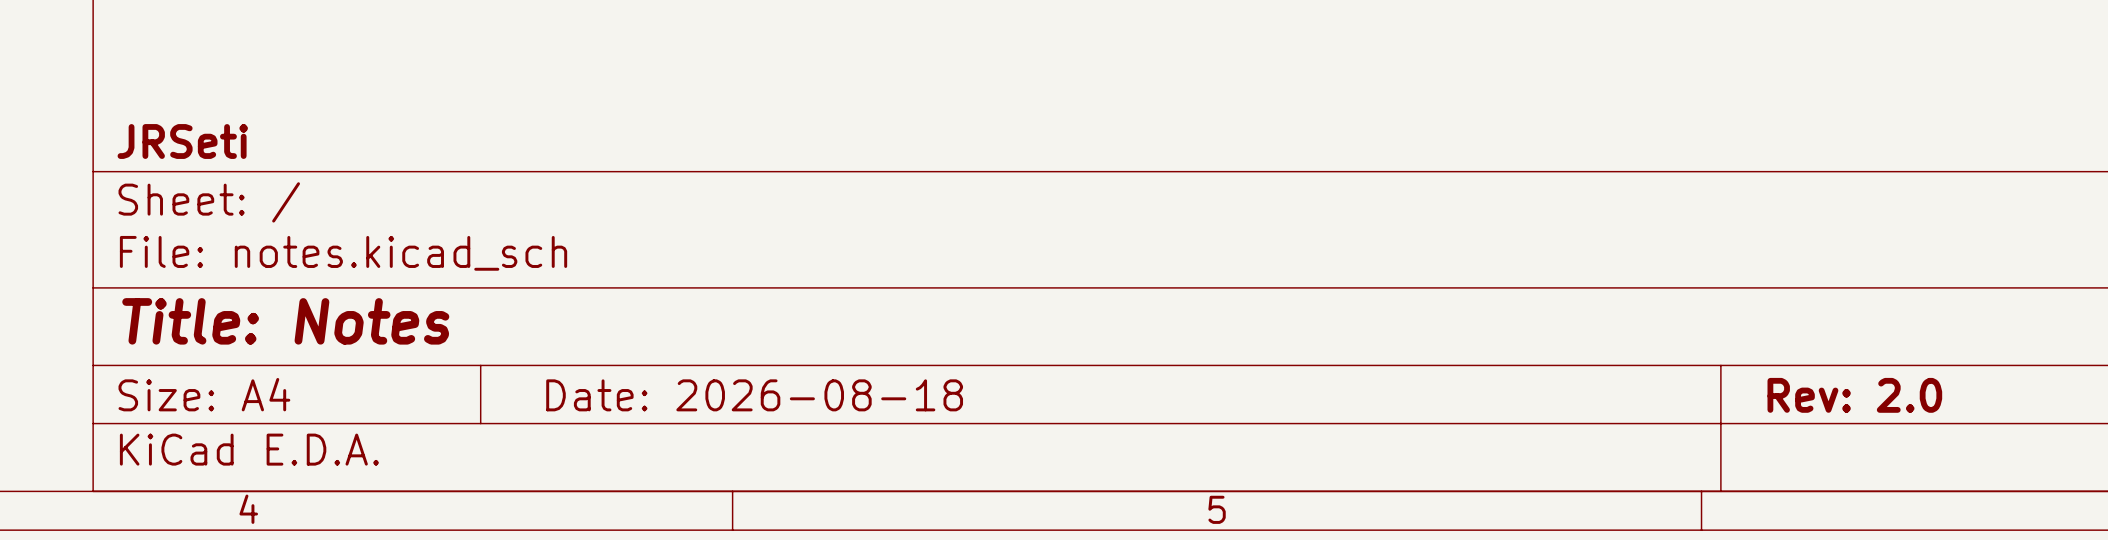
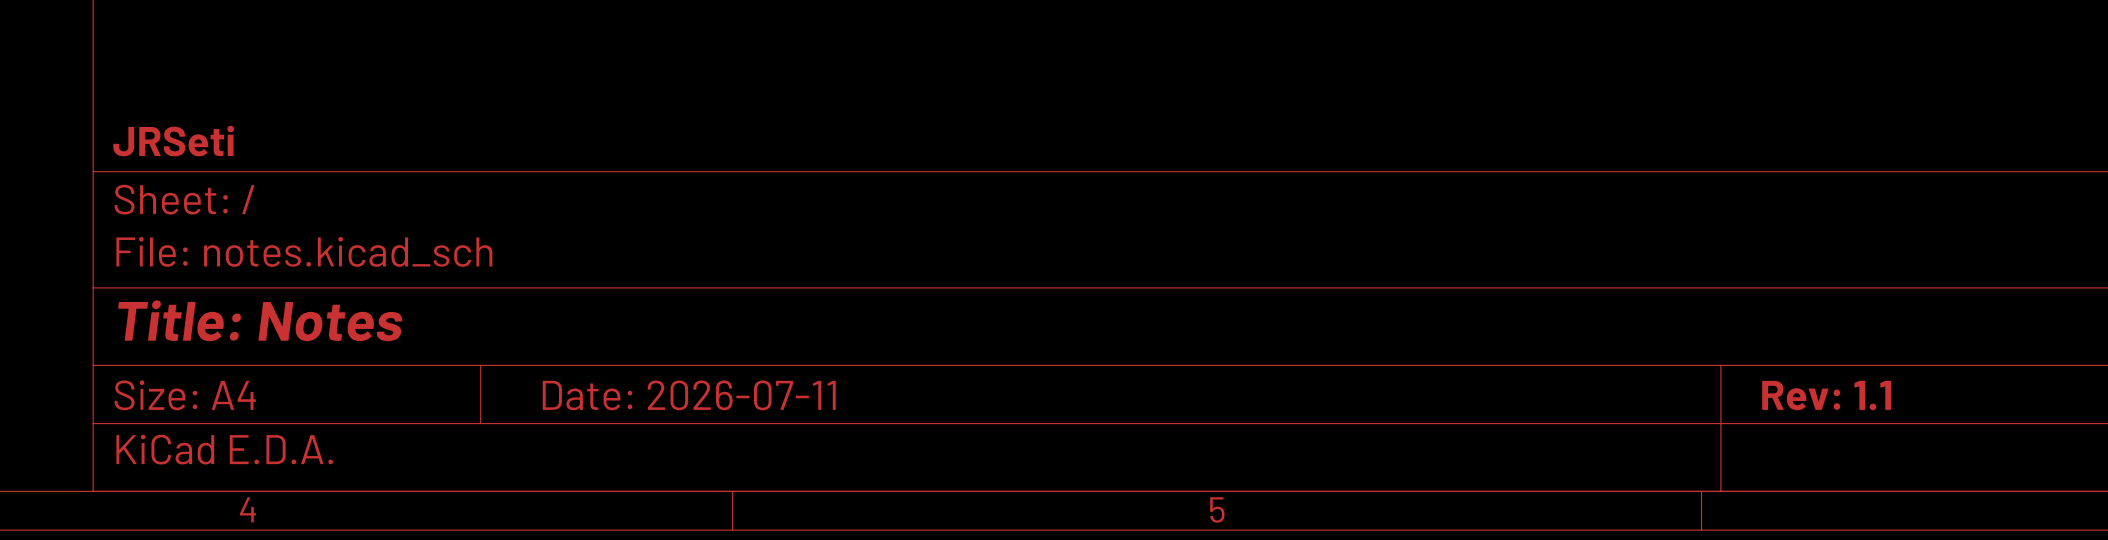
title block: Date: 2026-08-18 (754, 395) -> Date: 2026-07-11 (689, 395)
title block: Rev: 2.0 (1854, 395) -> Rev: 1.1 (1826, 395)

